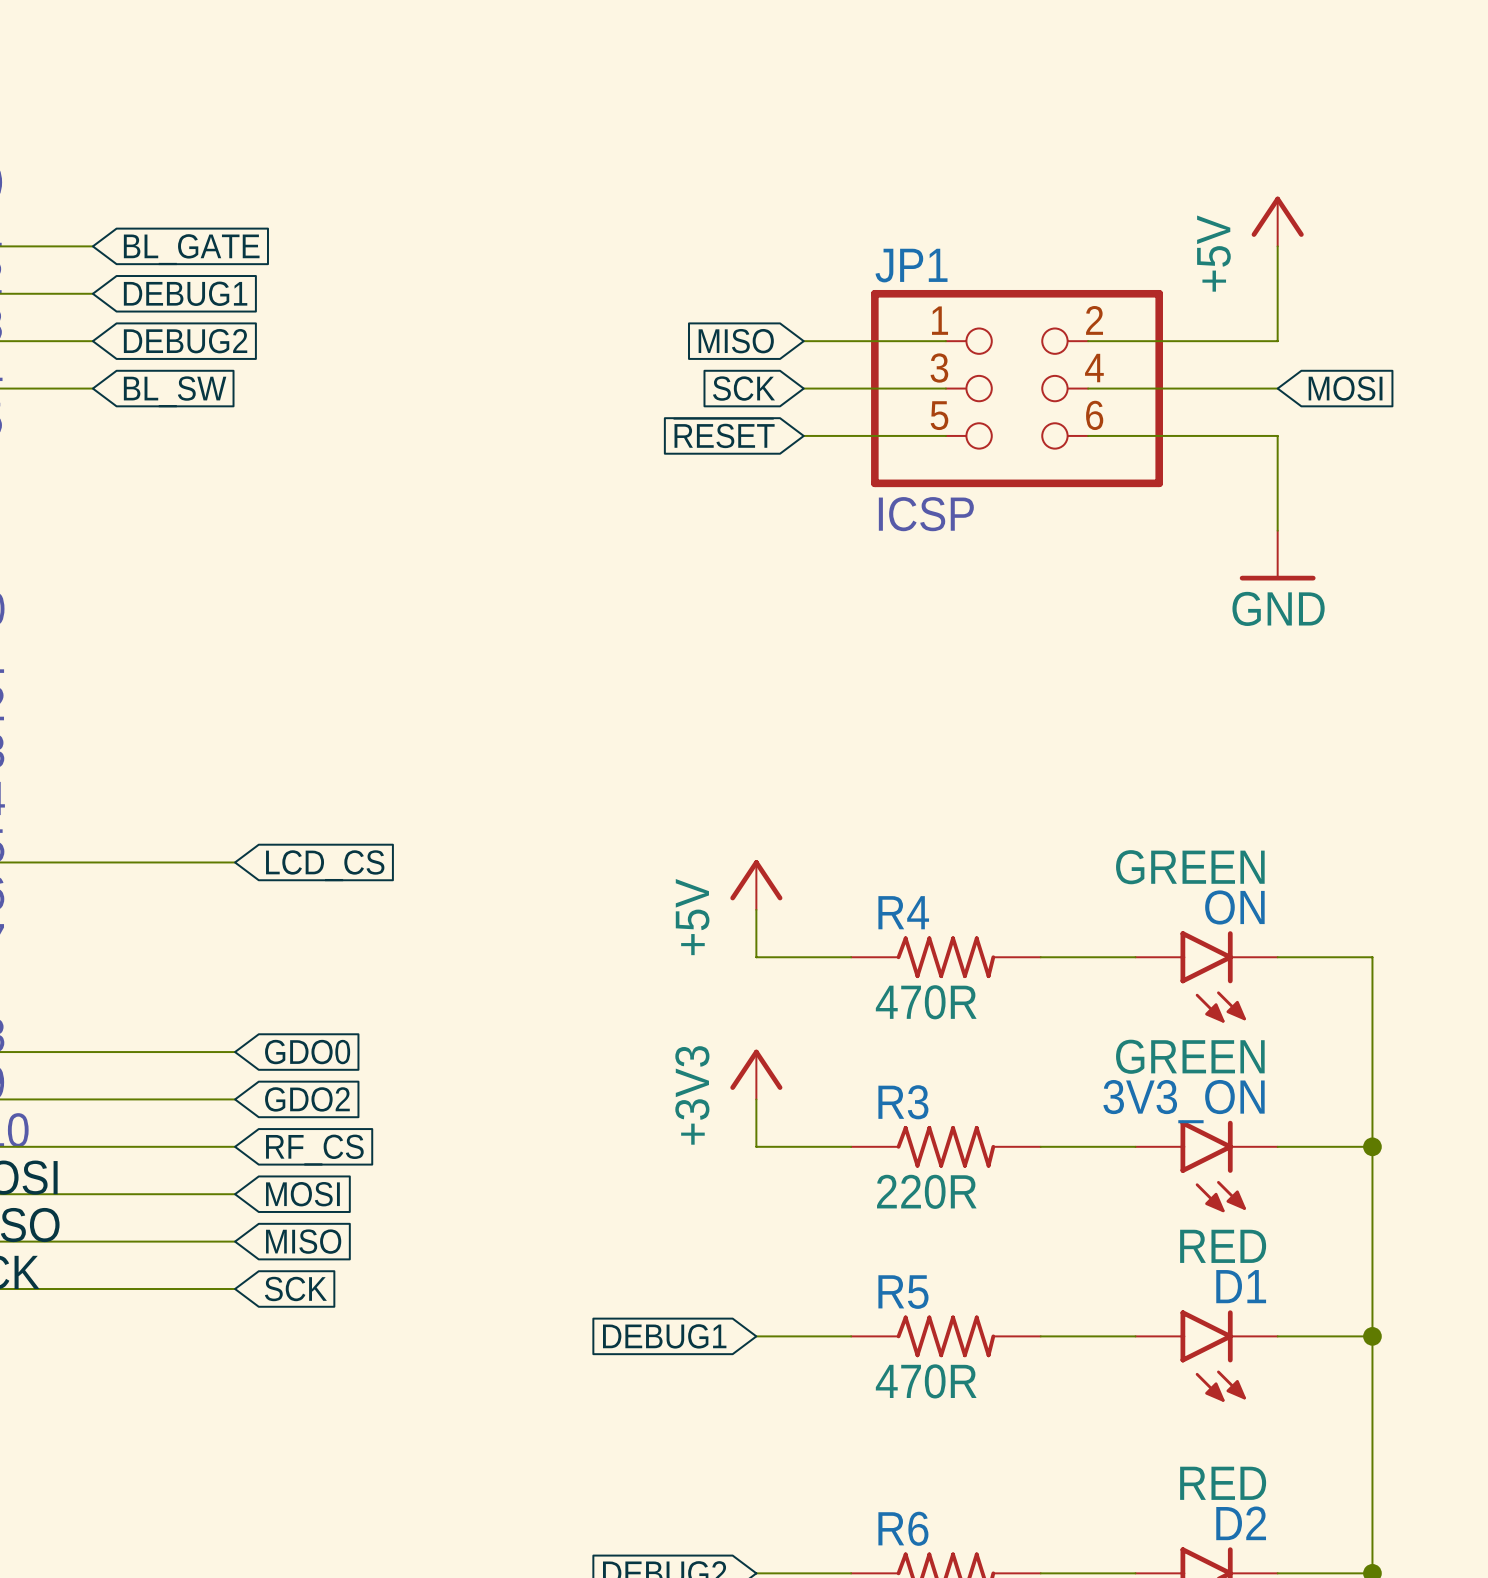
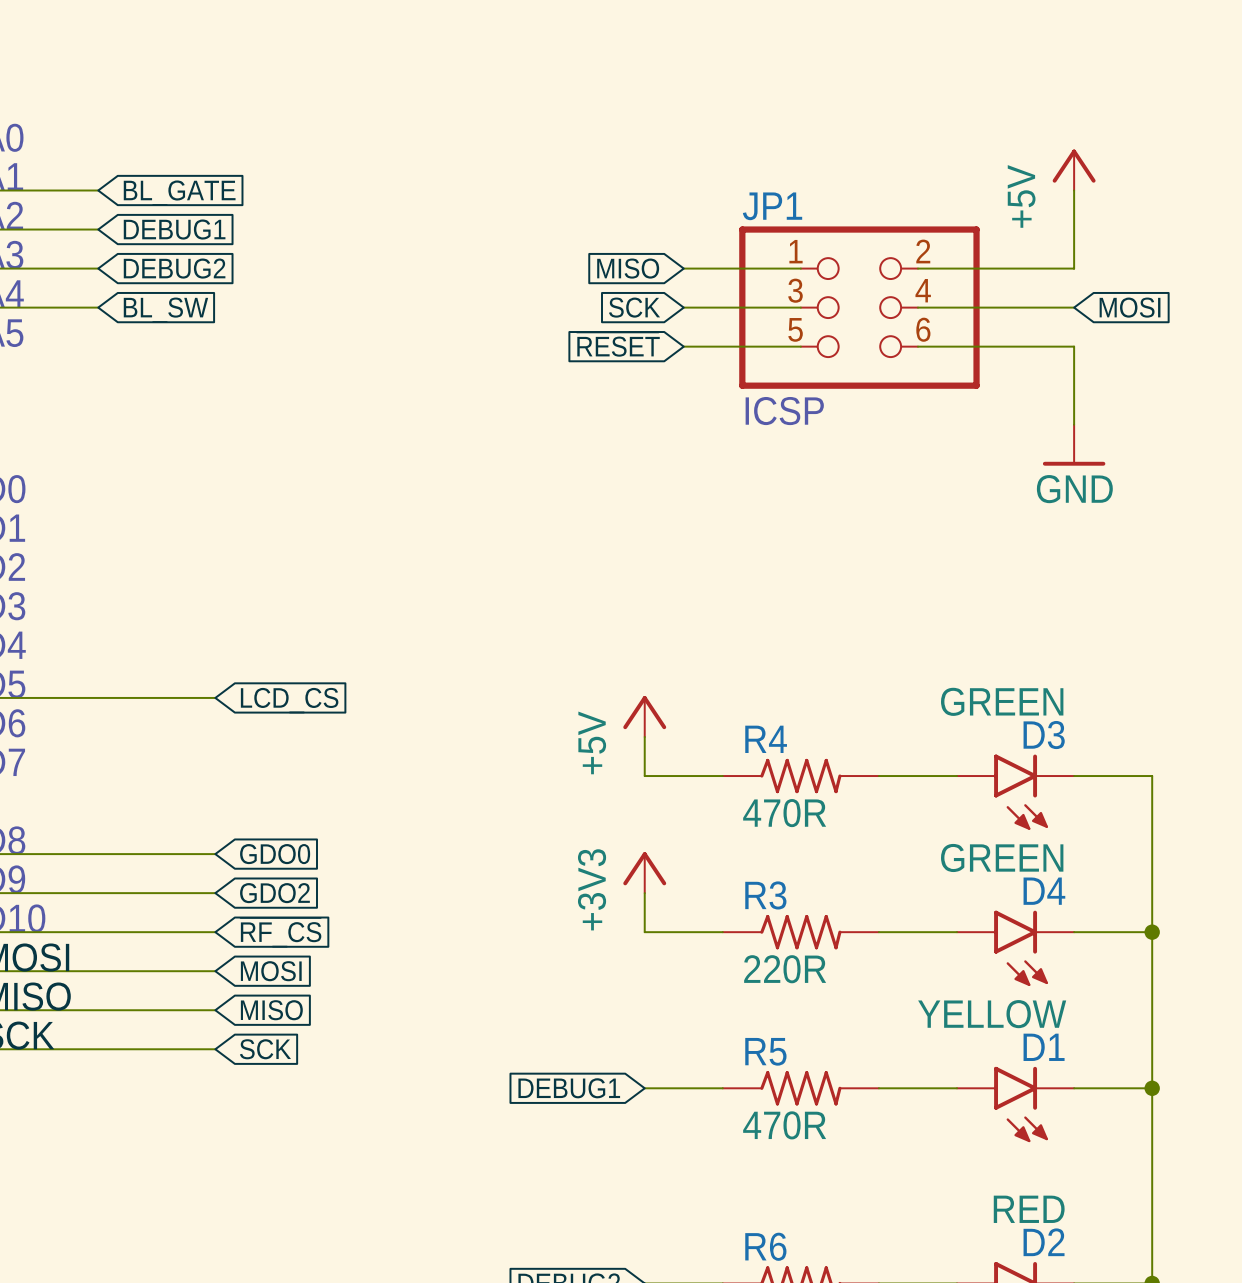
ON name: ON (1234, 907) -> D3 (1044, 735)
3V3_ON name: 3V3_ON (1184, 1101) -> D4 (1044, 891)
global label: RF_CS (314, 1150) -> ~{RF_CS} (280, 932)
D1 value: RED (1223, 1246) -> YELLOW (992, 1014)

